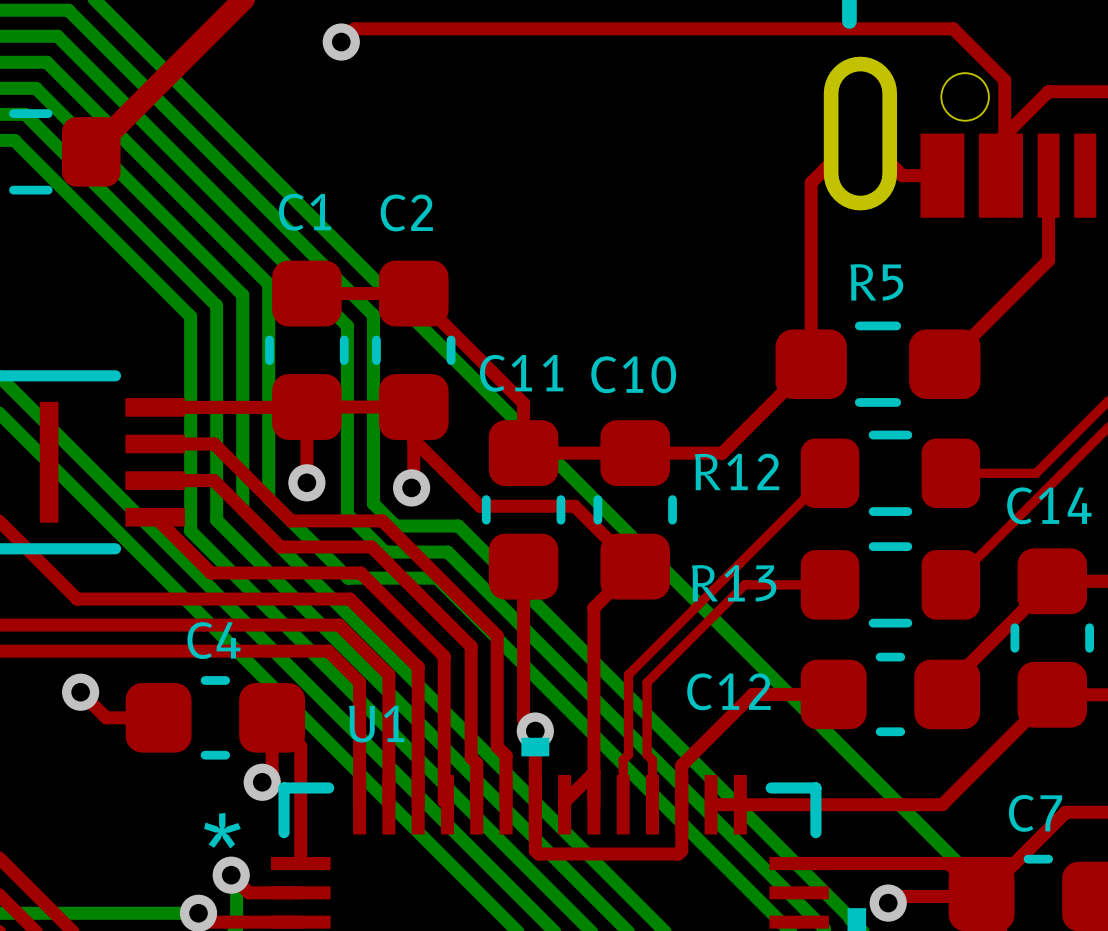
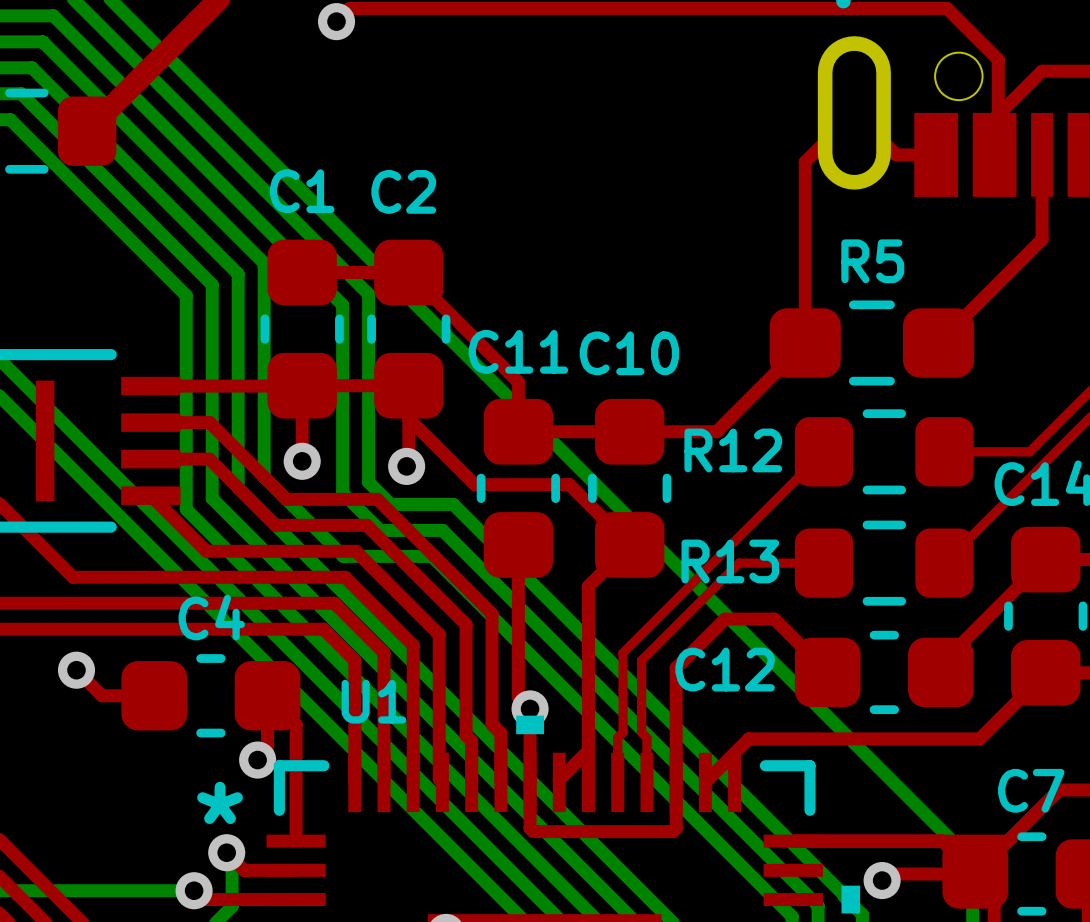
top track: (833, 694) (752, 694) (681, 765) -> (827, 672) (774, 619) (725, 619) (676, 668) (676, 743)
top track: (985, 761) (942, 804) (711, 804) -> (979, 738) (748, 738) (705, 782)

